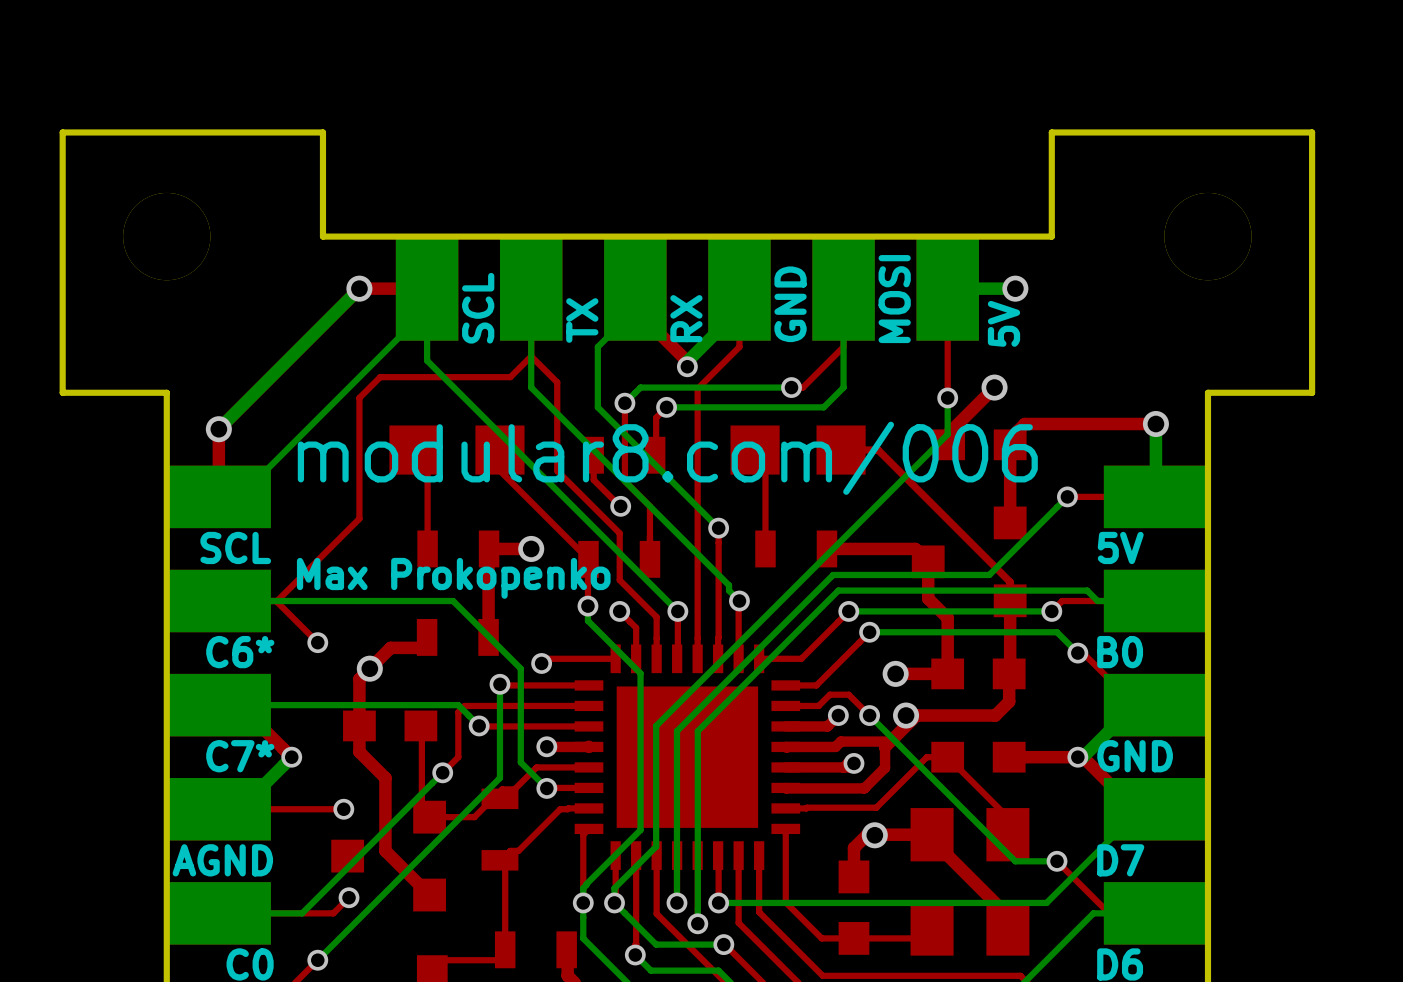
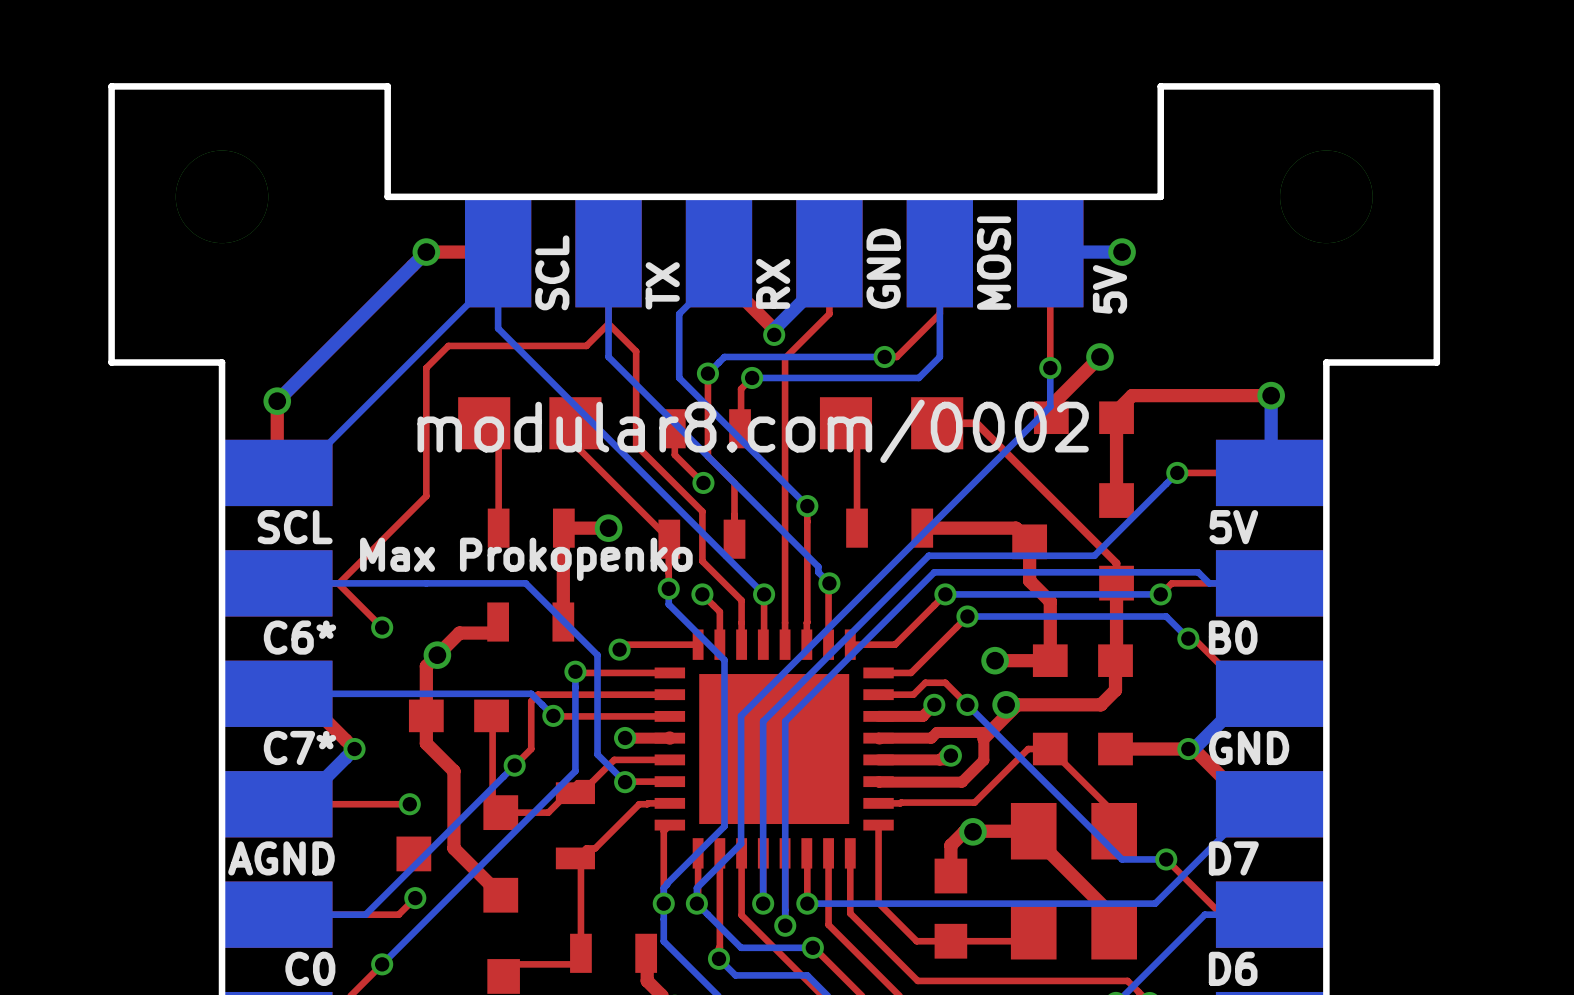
text: modular8.com/006 (667, 458) -> modular8.com/0002 (753, 431)

